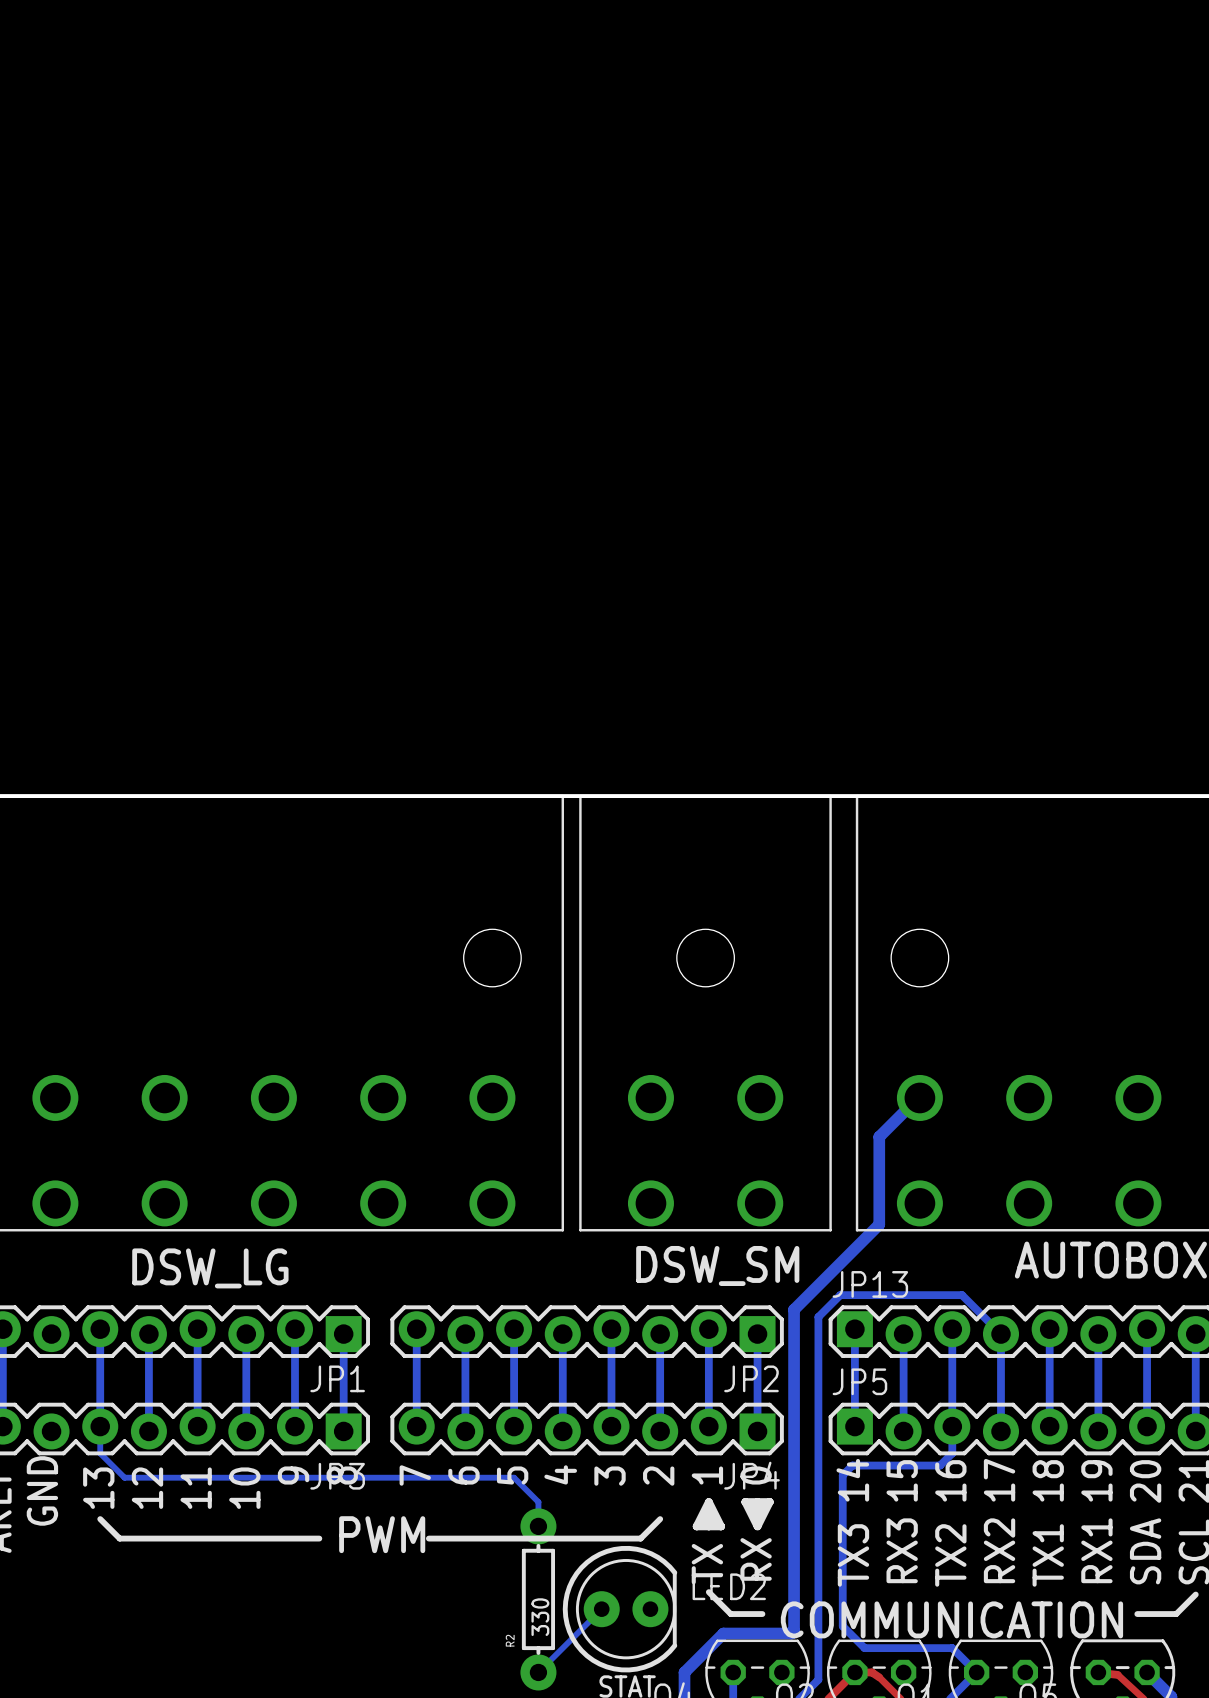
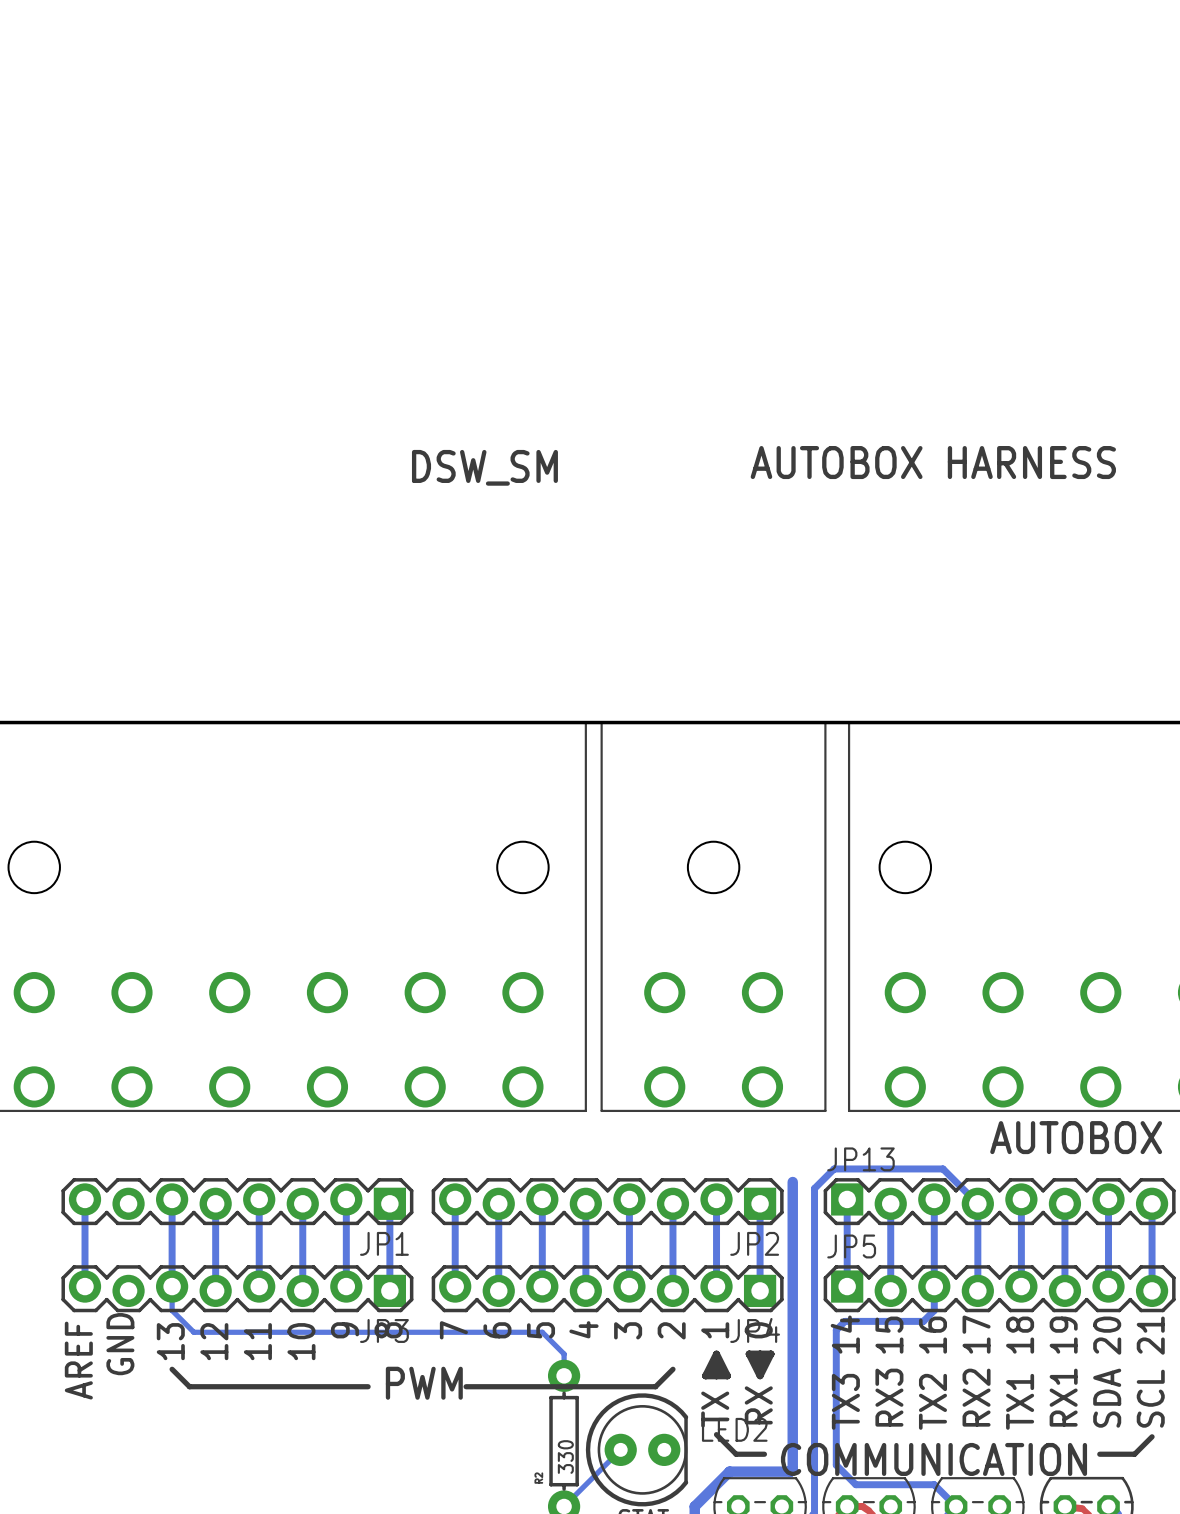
text: none -> AUTOBOX HARNESS (933, 462)
text: none -> DSW_SM (484, 467)
bottom track: (919, 1097) (879, 1136) (879, 1224) (794, 1309) -> none
text: DSW_SM (717, 1265) -> none
text: DSW_LG (210, 1268) -> none

